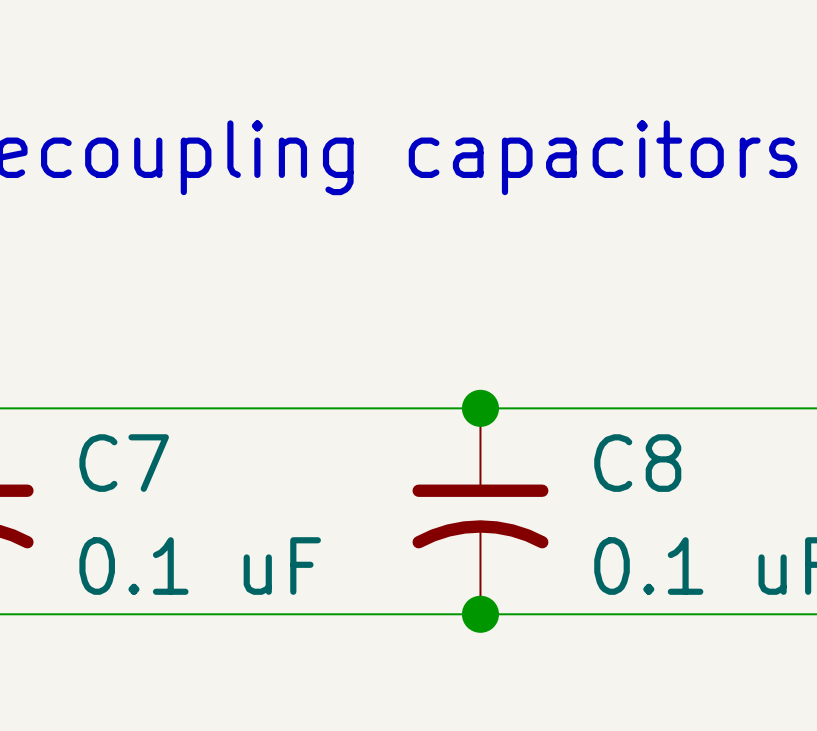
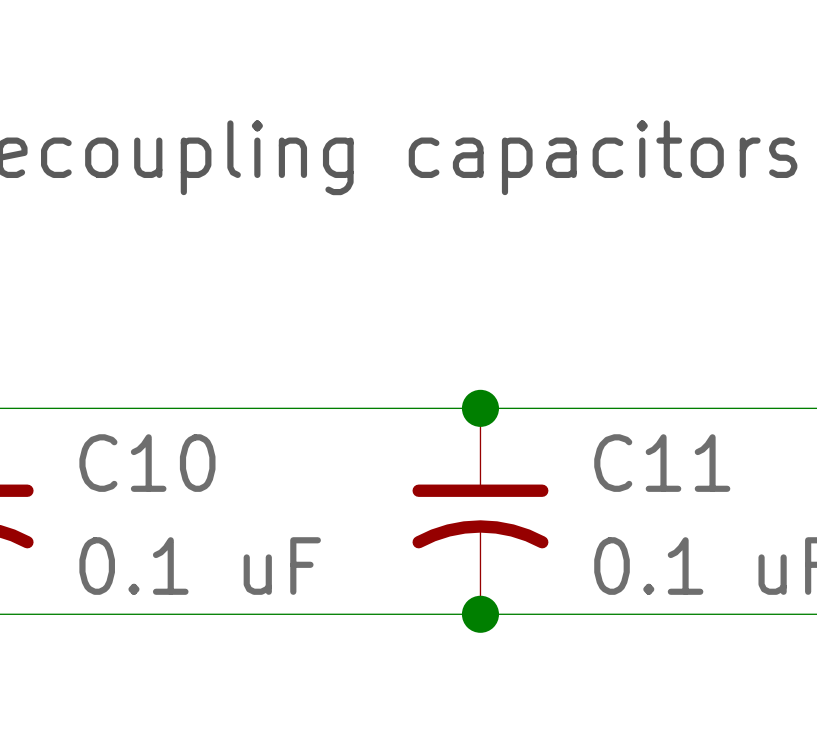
C7 name: C7 (124, 463) -> C10 (147, 463)
C8 name: C8 (637, 463) -> C11 (662, 463)

